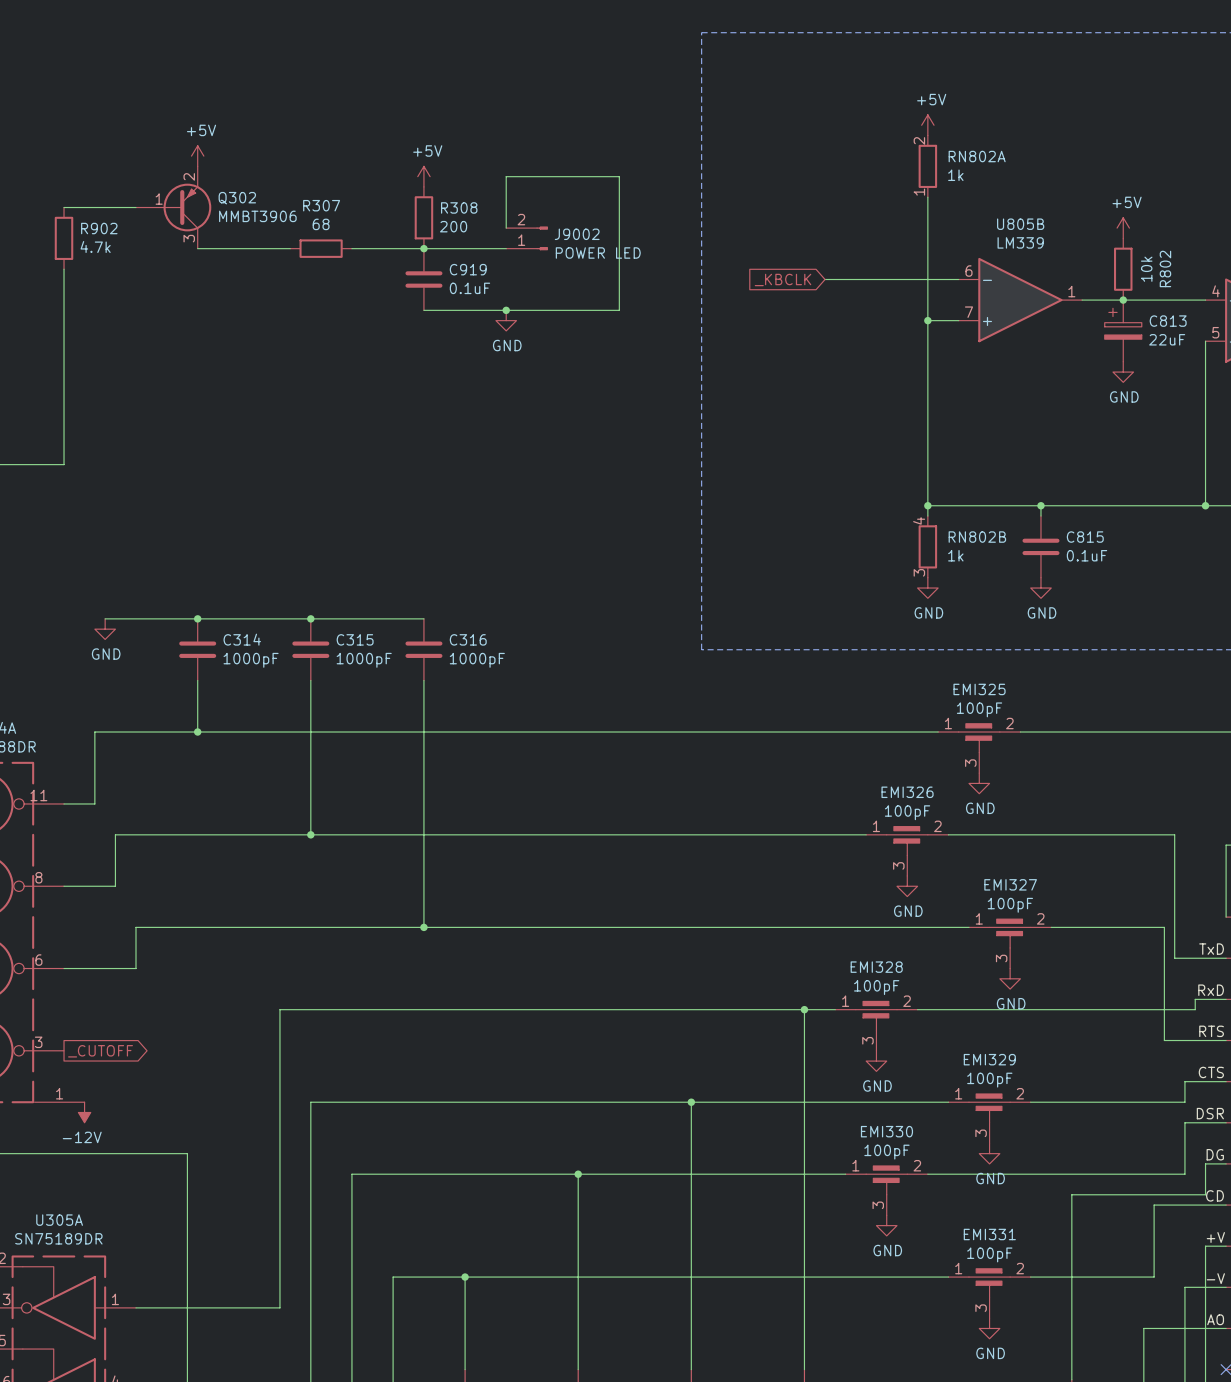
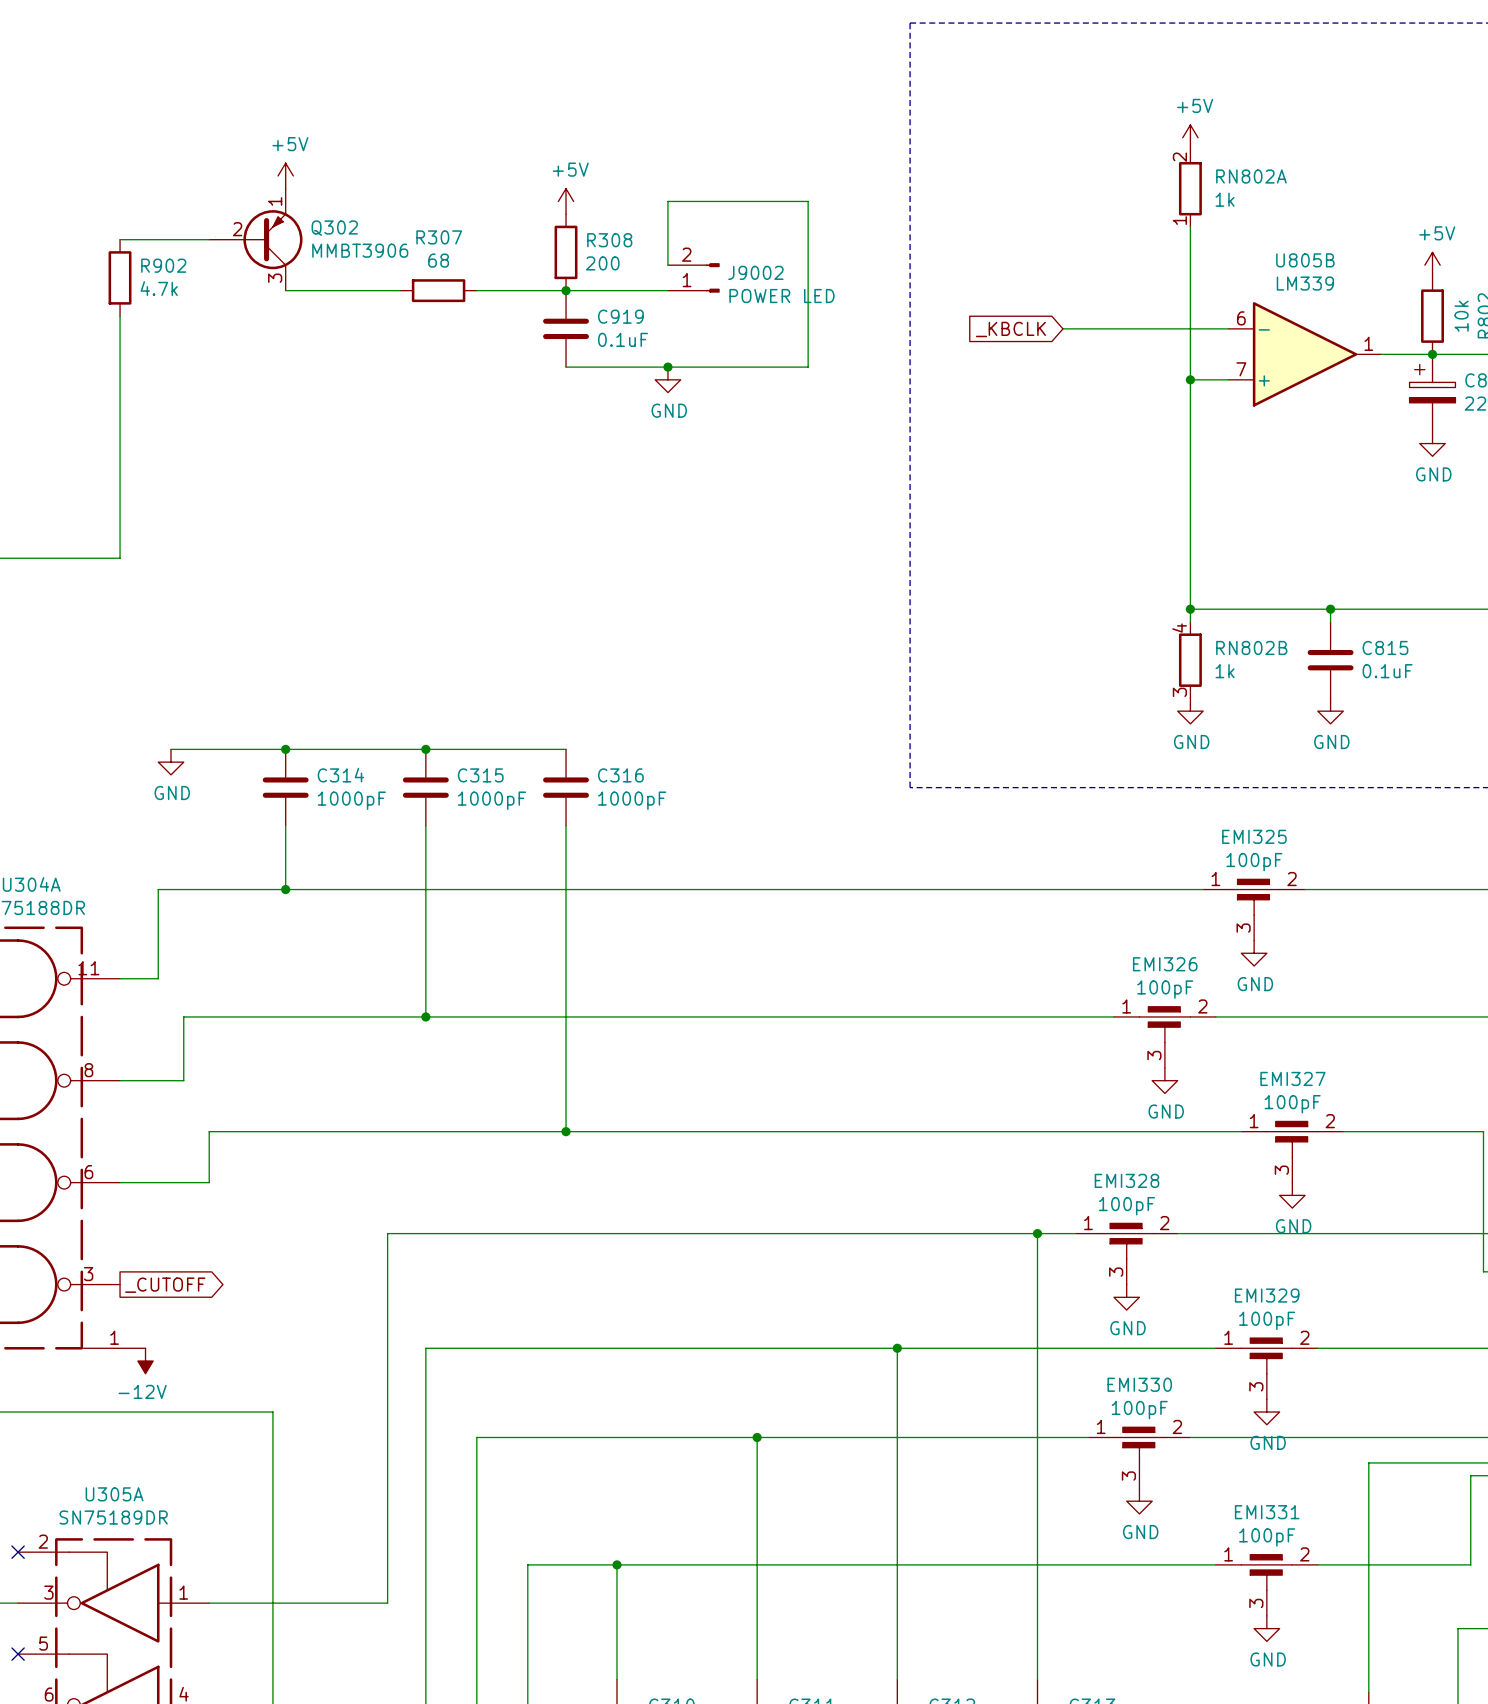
Q302 pin number: 2 (189, 176) -> 1 (275, 201)
Q302 pin number: 1 (159, 199) -> 2 (237, 229)

